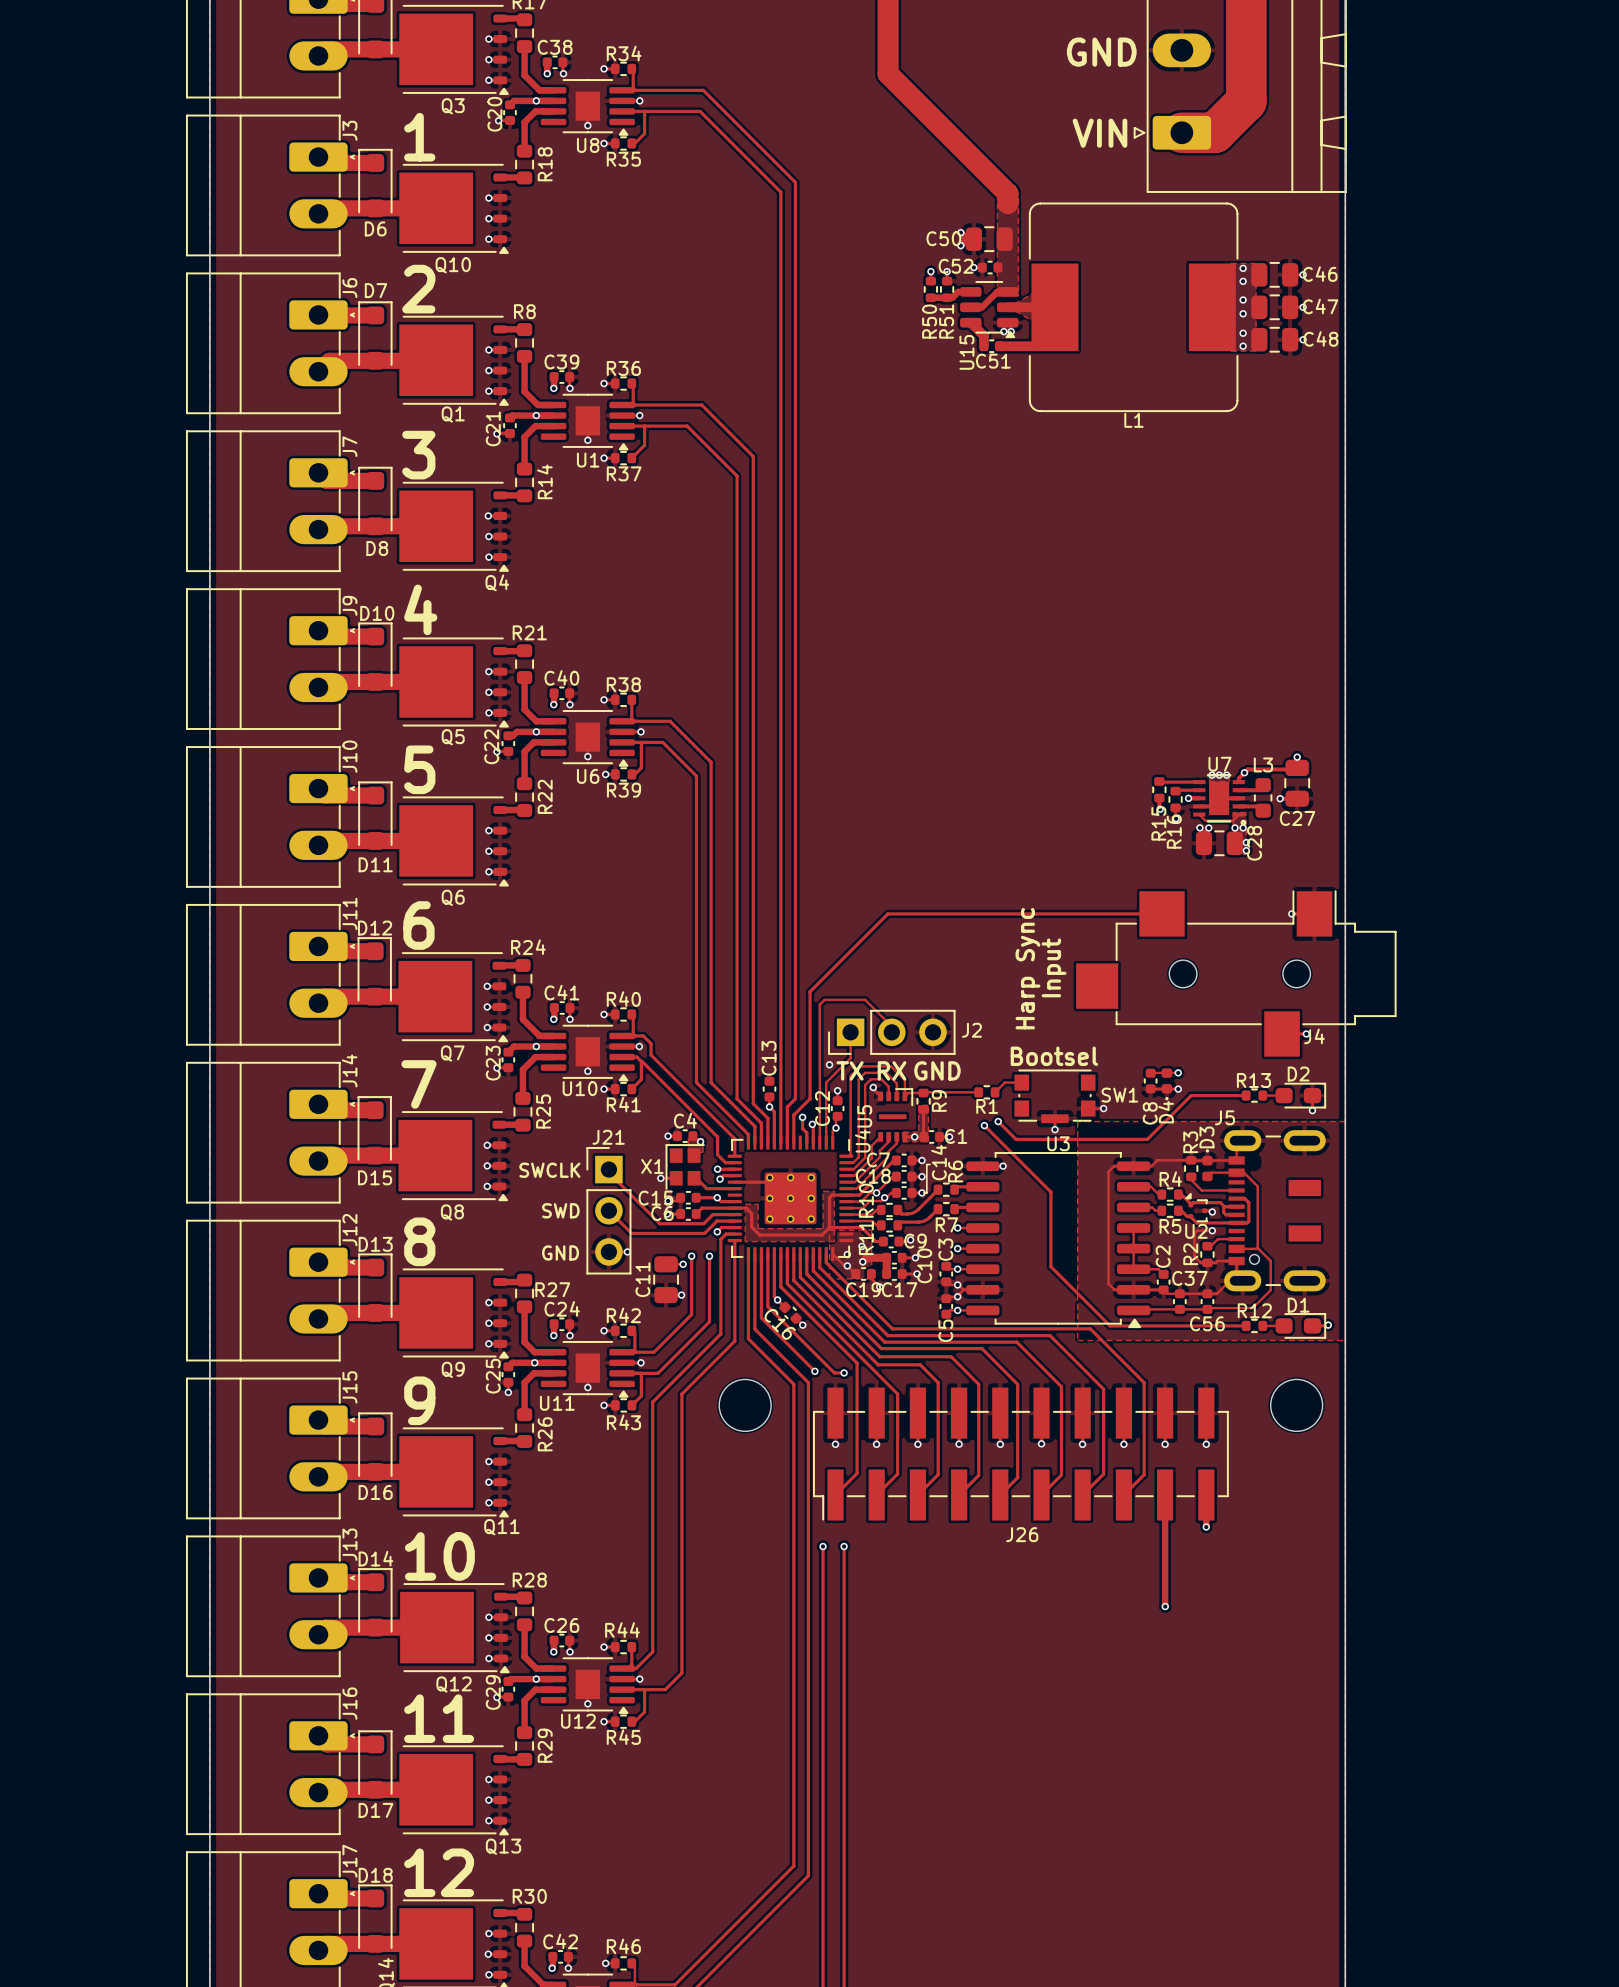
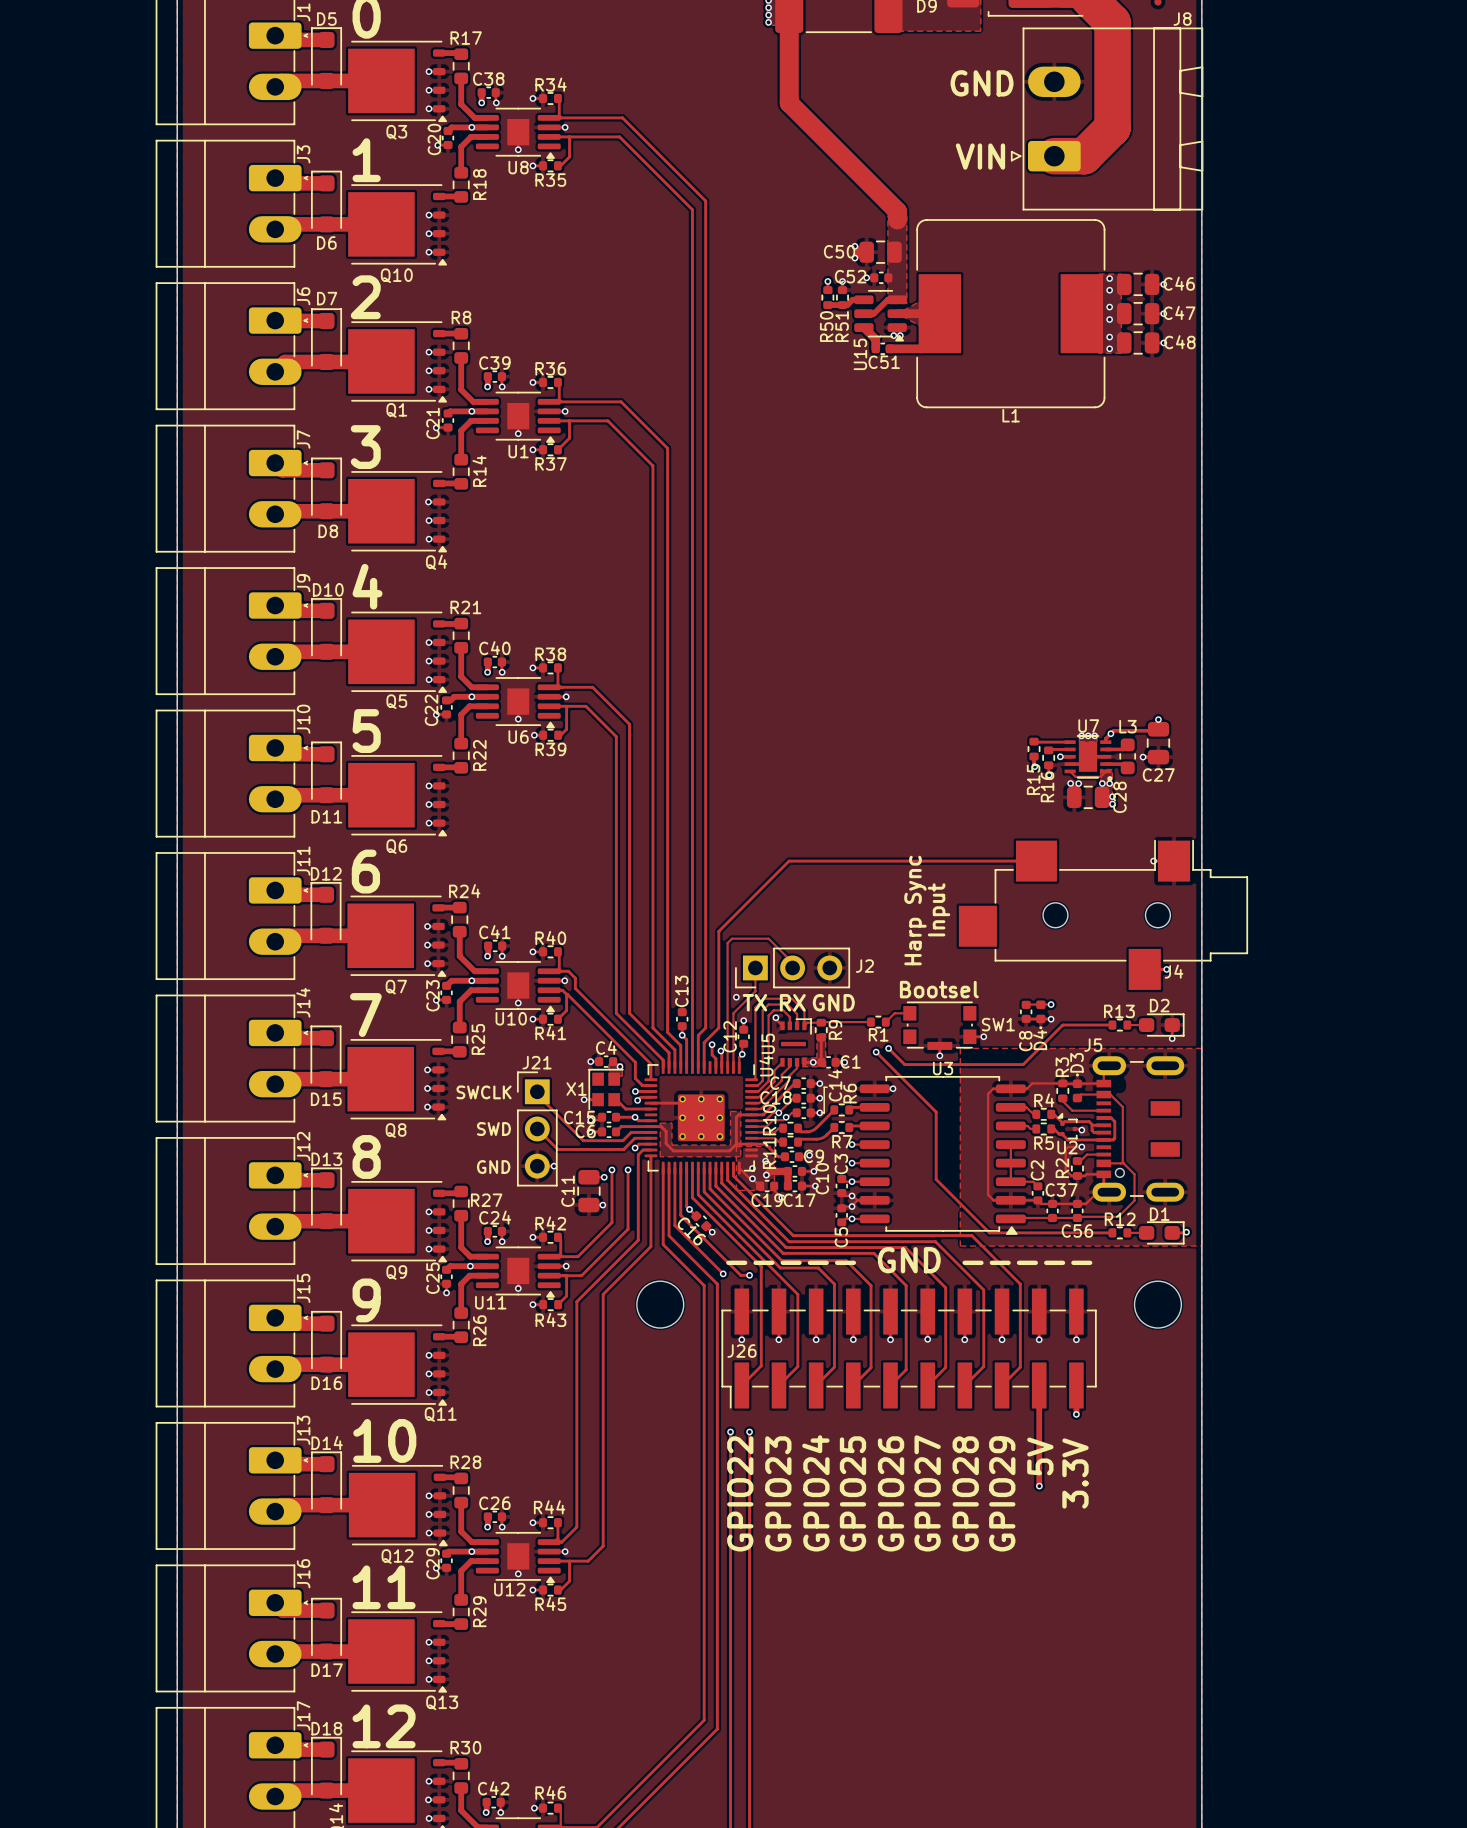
text: none -> ----- GND ----- (909, 1260)
J26 name position: J26 (1022, 1534) -> J26 (741, 1351)
text: none -> 5V (1040, 1456)
text: none -> 3.3V (1075, 1473)
text: none -> GPIO24 (815, 1493)
text: none -> GPIO27 (927, 1493)
text: none -> GPIO22 (740, 1493)
text: none -> GPIO23 (778, 1493)
text: none -> GPIO25 (852, 1493)
text: none -> GPIO26 (891, 1493)
text: none -> GPIO28 (965, 1493)
text: none -> GPIO29 (1002, 1493)

